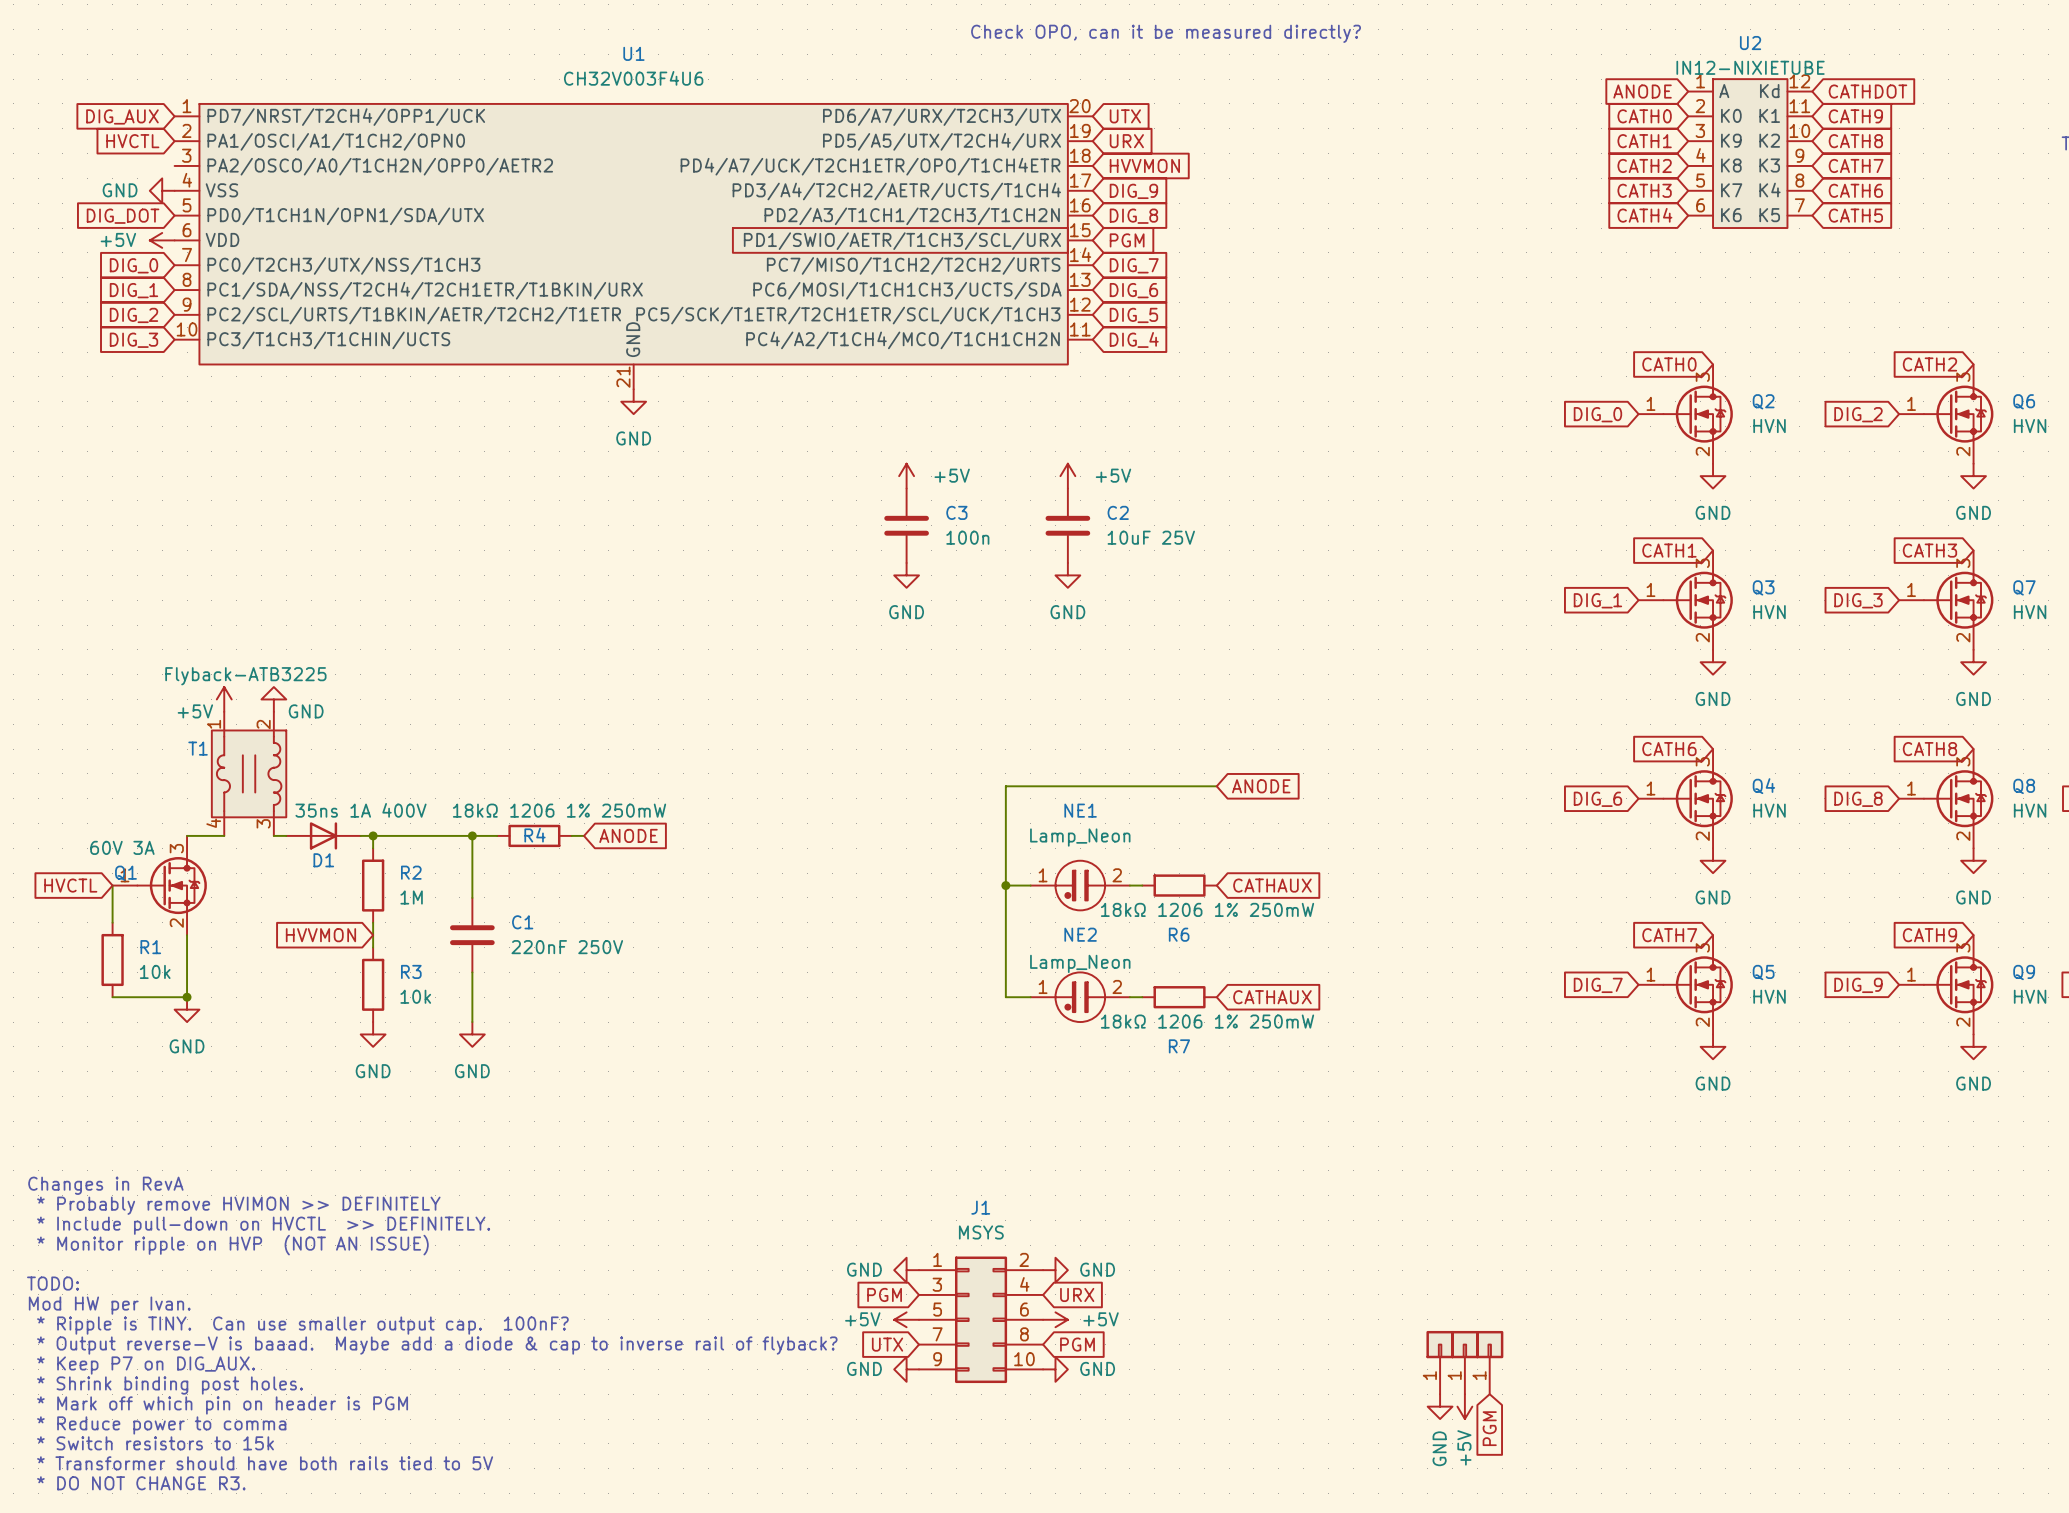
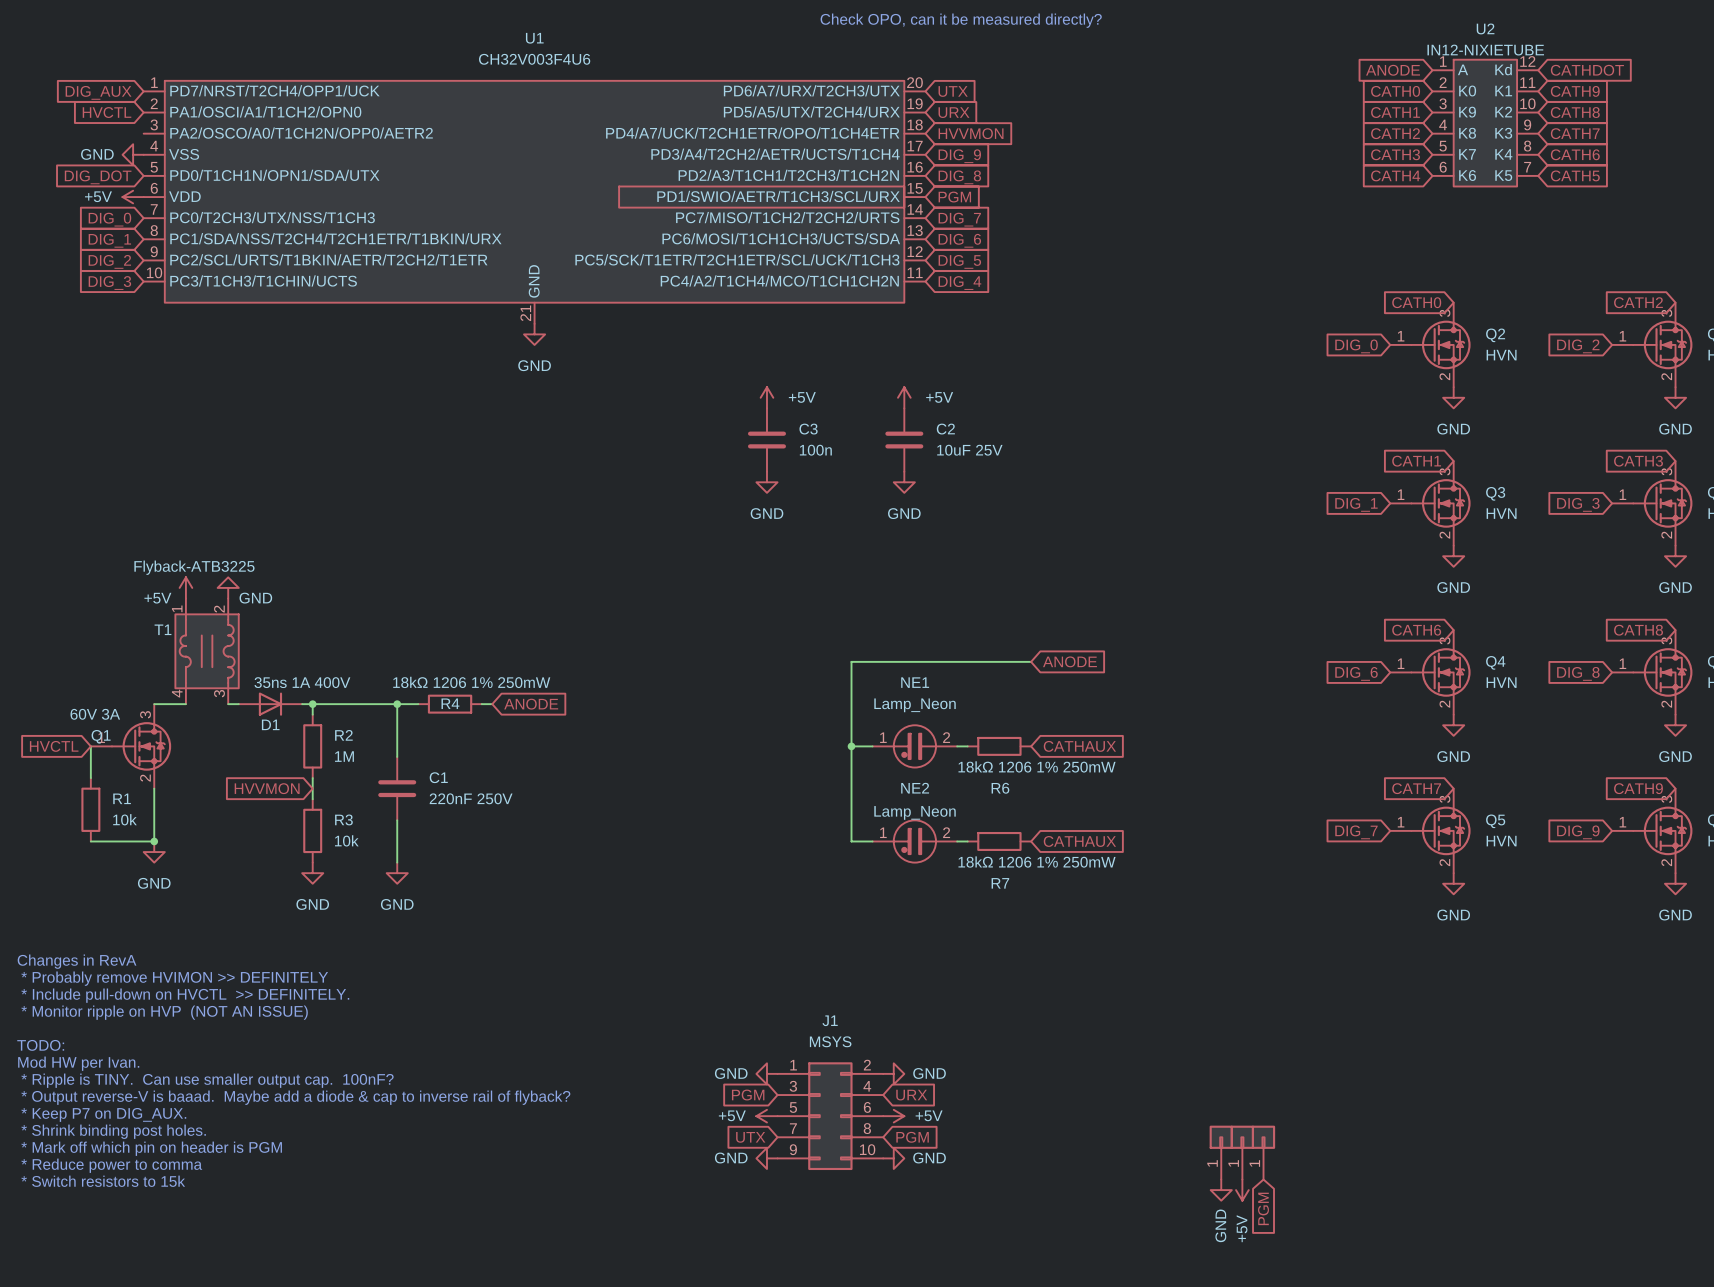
text position: Changes in RevA (105, 1185) -> Changes in RevA (77, 961)
text position: * Probably remove HVIMON >> DEFINITELY (238, 1205) -> * Probably remove HVIMON >> DEFINITELY (174, 978)
text position: * Include pull-down on HVCTL >> DEFINITELY. (263, 1225) -> * Include pull-down on HVCTL >> DEFINITELY. (185, 995)
text position: * Monitor ripple on HVP (NOT AN ISSUE) (232, 1245) -> * Monitor ripple on HVP (NOT AN ISSUE) (164, 1012)
text position: TODO: (53, 1283) -> TODO: (40, 1045)
text position: Mod HW per Ivan. (109, 1305) -> Mod HW per Ivan. (78, 1063)
text position: * Ripple is TINY. Can use smaller output cap. 100nF? (302, 1325) -> * Ripple is TINY. Can use smaller output cap. 100nF? (207, 1080)
text position: * Output reverse-V is baaad. Maybe add a diode & cap to inverse rail of flyback? (437, 1345) -> * Output reverse-V is baaad. Maybe add a diode & cap to inverse rail of flyback? (295, 1097)
text position: * Keep P7 on DIG_AUX. (146, 1365) -> * Keep P7 on DIG_AUX. (103, 1114)
text position: * Shrink binding post holes. (169, 1385) -> * Shrink binding post holes. (113, 1131)
text position: * Mark off which pin on header is PGM (222, 1405) -> * Mark off which pin on header is PGM (151, 1148)
text position: * Reduce power to comma (161, 1425) -> * Reduce power to comma (111, 1165)
text position: * Switch resistors to 15k (155, 1443) -> * Switch resistors to 15k (103, 1181)
text: * Transformer should have both rails tied to 5V (265, 1463) -> none
text: * DO NOT CHANGE R3. (141, 1483) -> none

